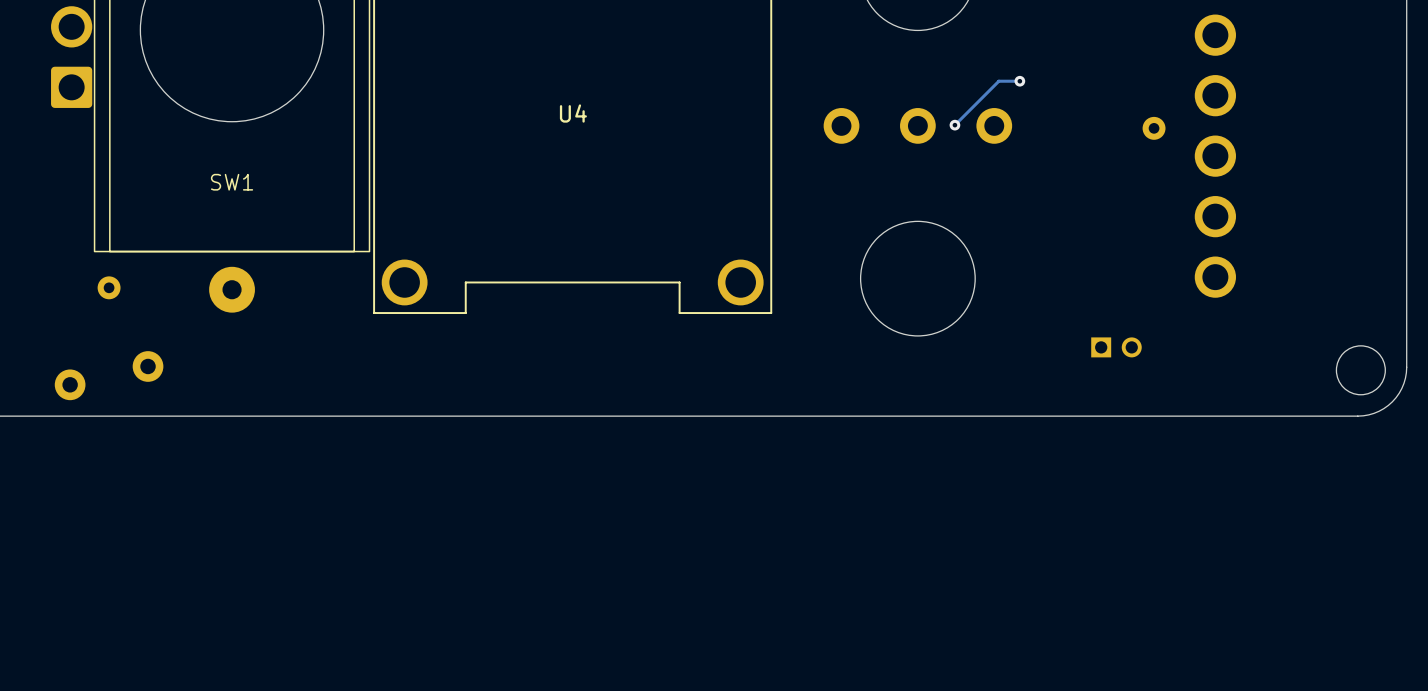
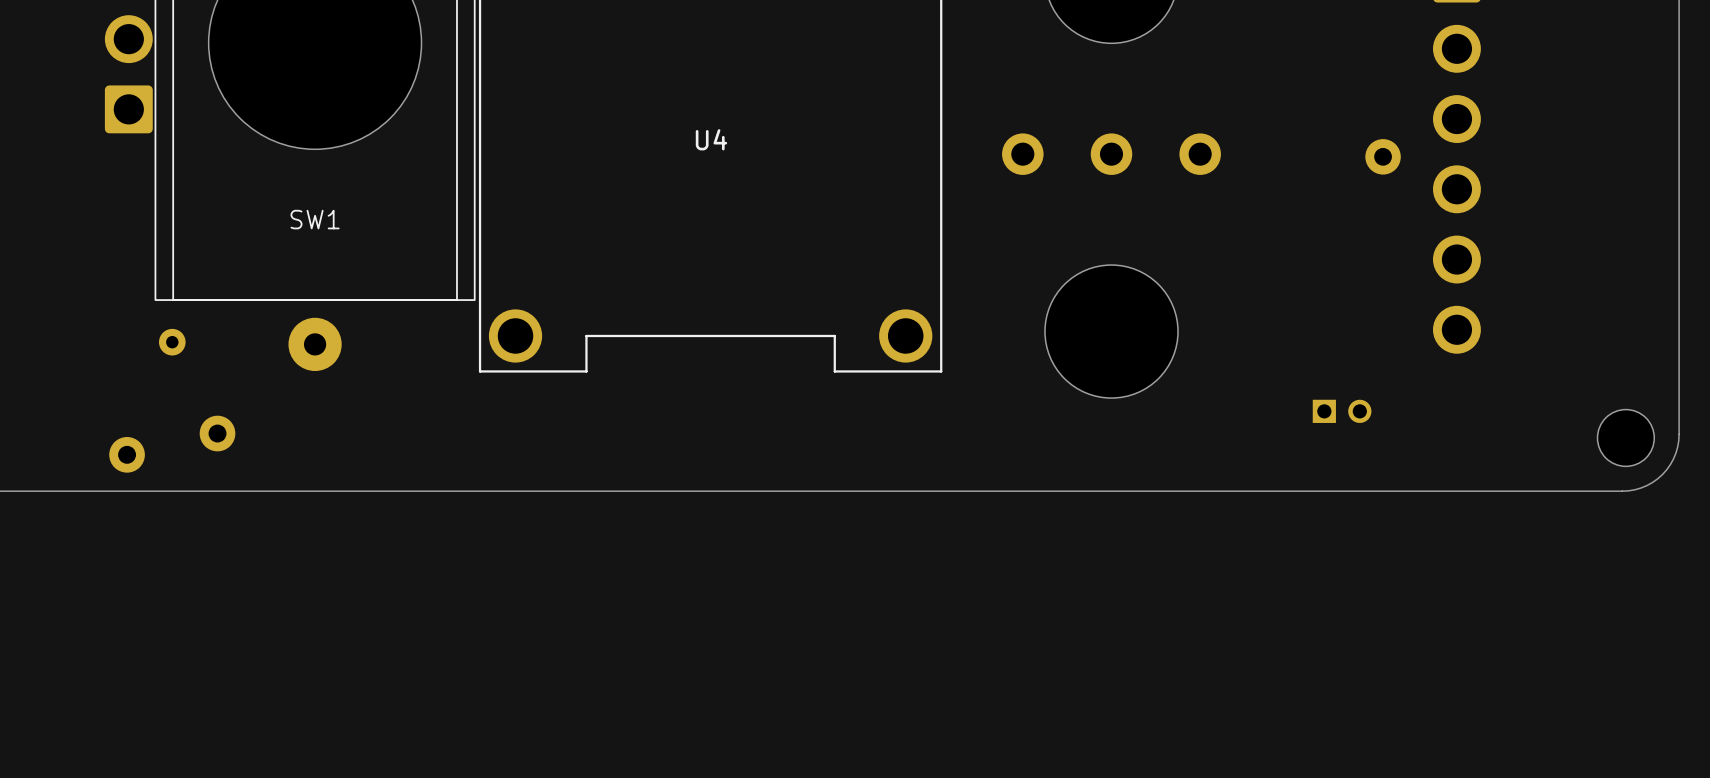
track: (1019, 81) (998, 81) (954, 125) -> none
via: (1019, 81) -> none
part footprint: [1142, 116, 1166, 140] -> [1365, 139, 1401, 175]
via: (954, 125) -> none

